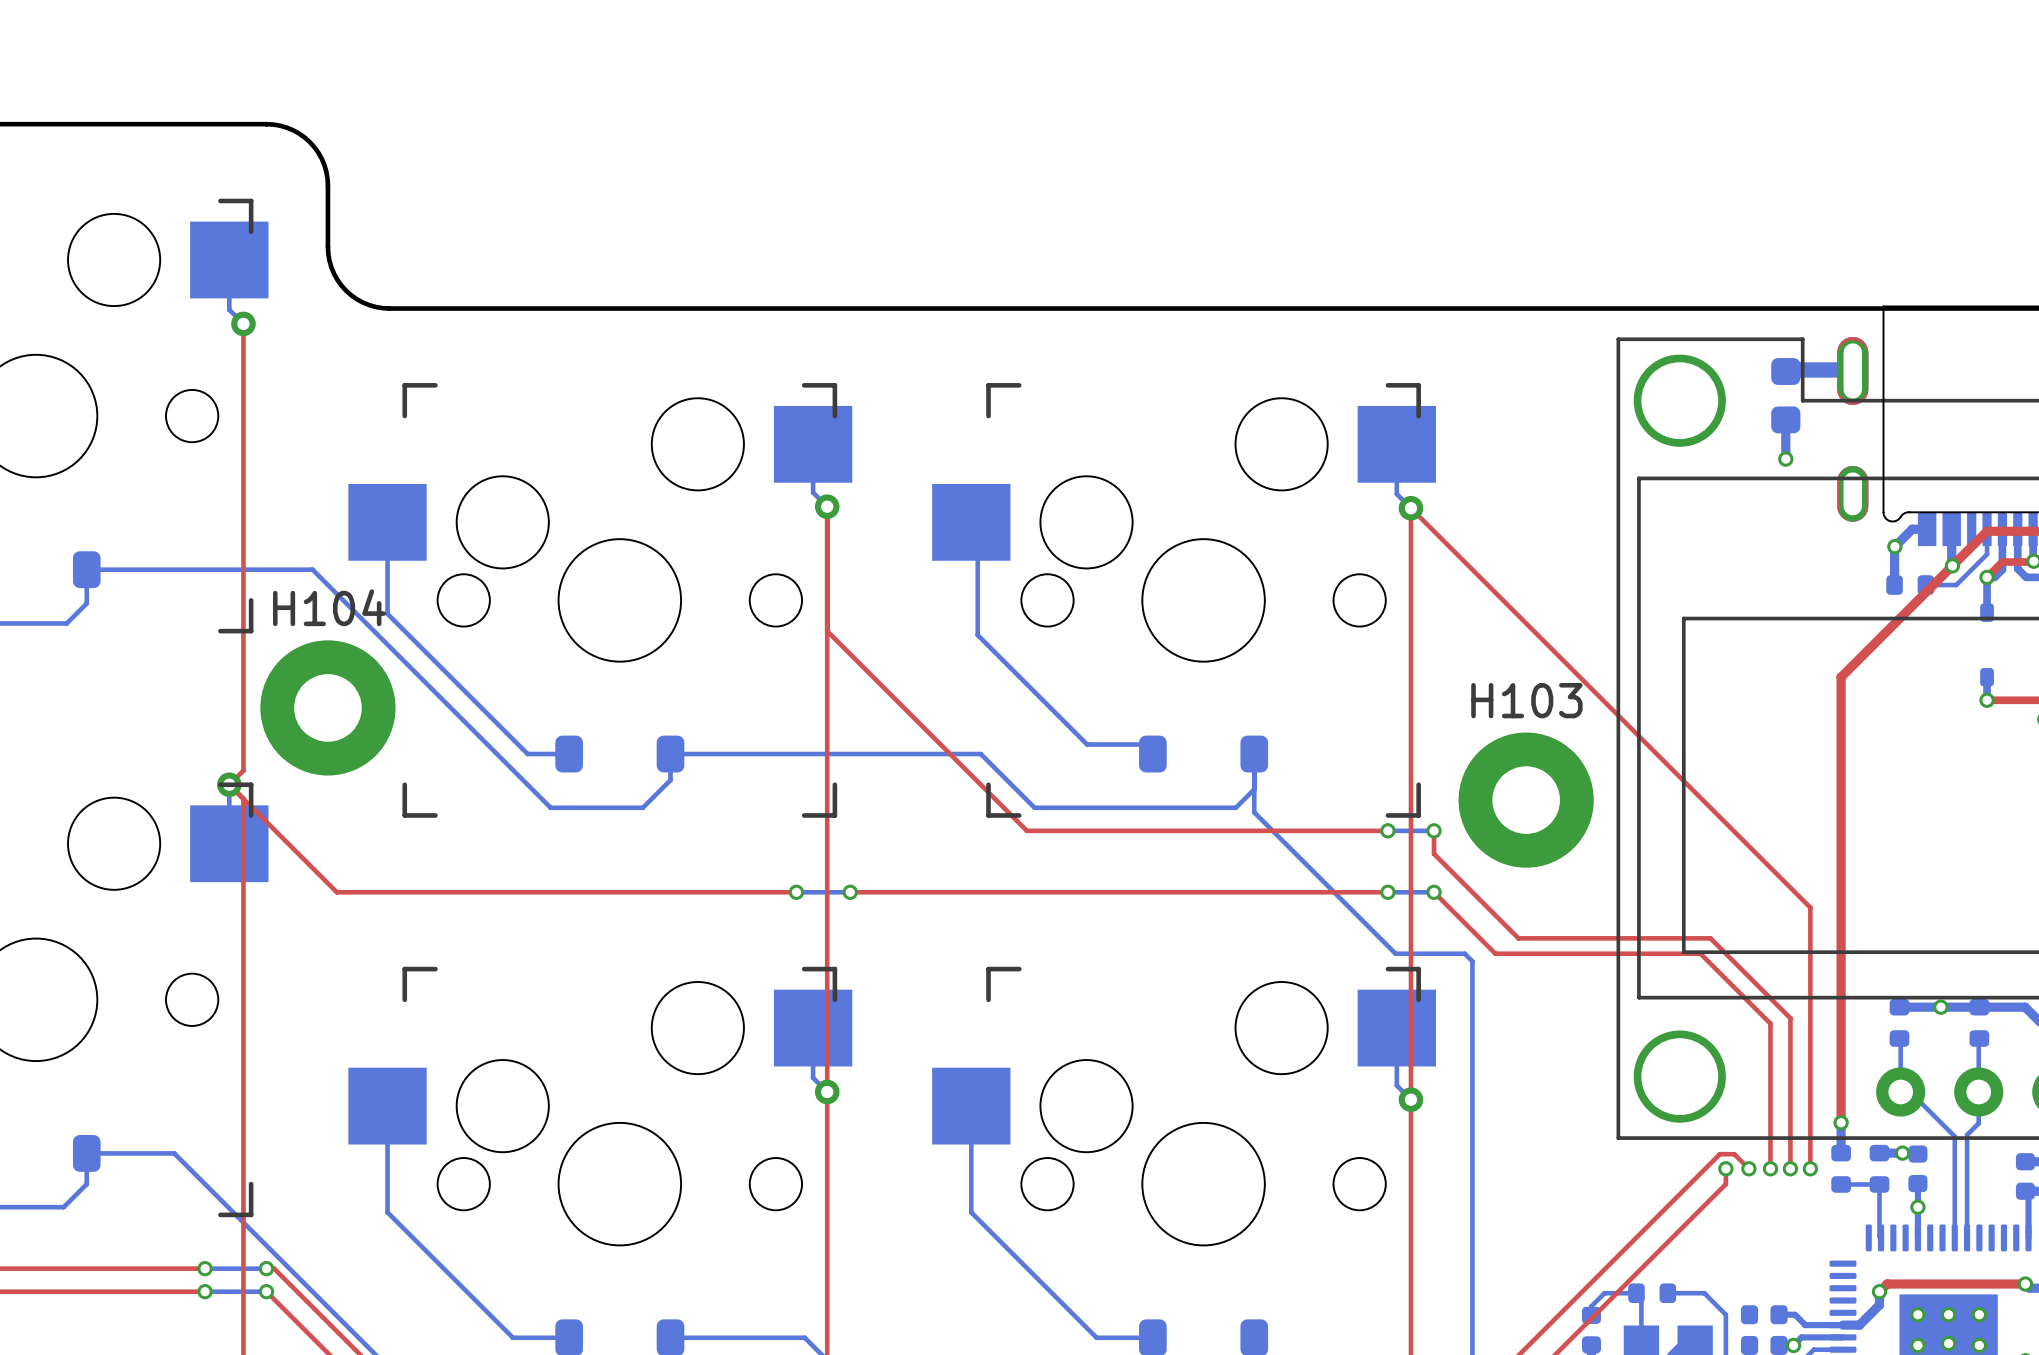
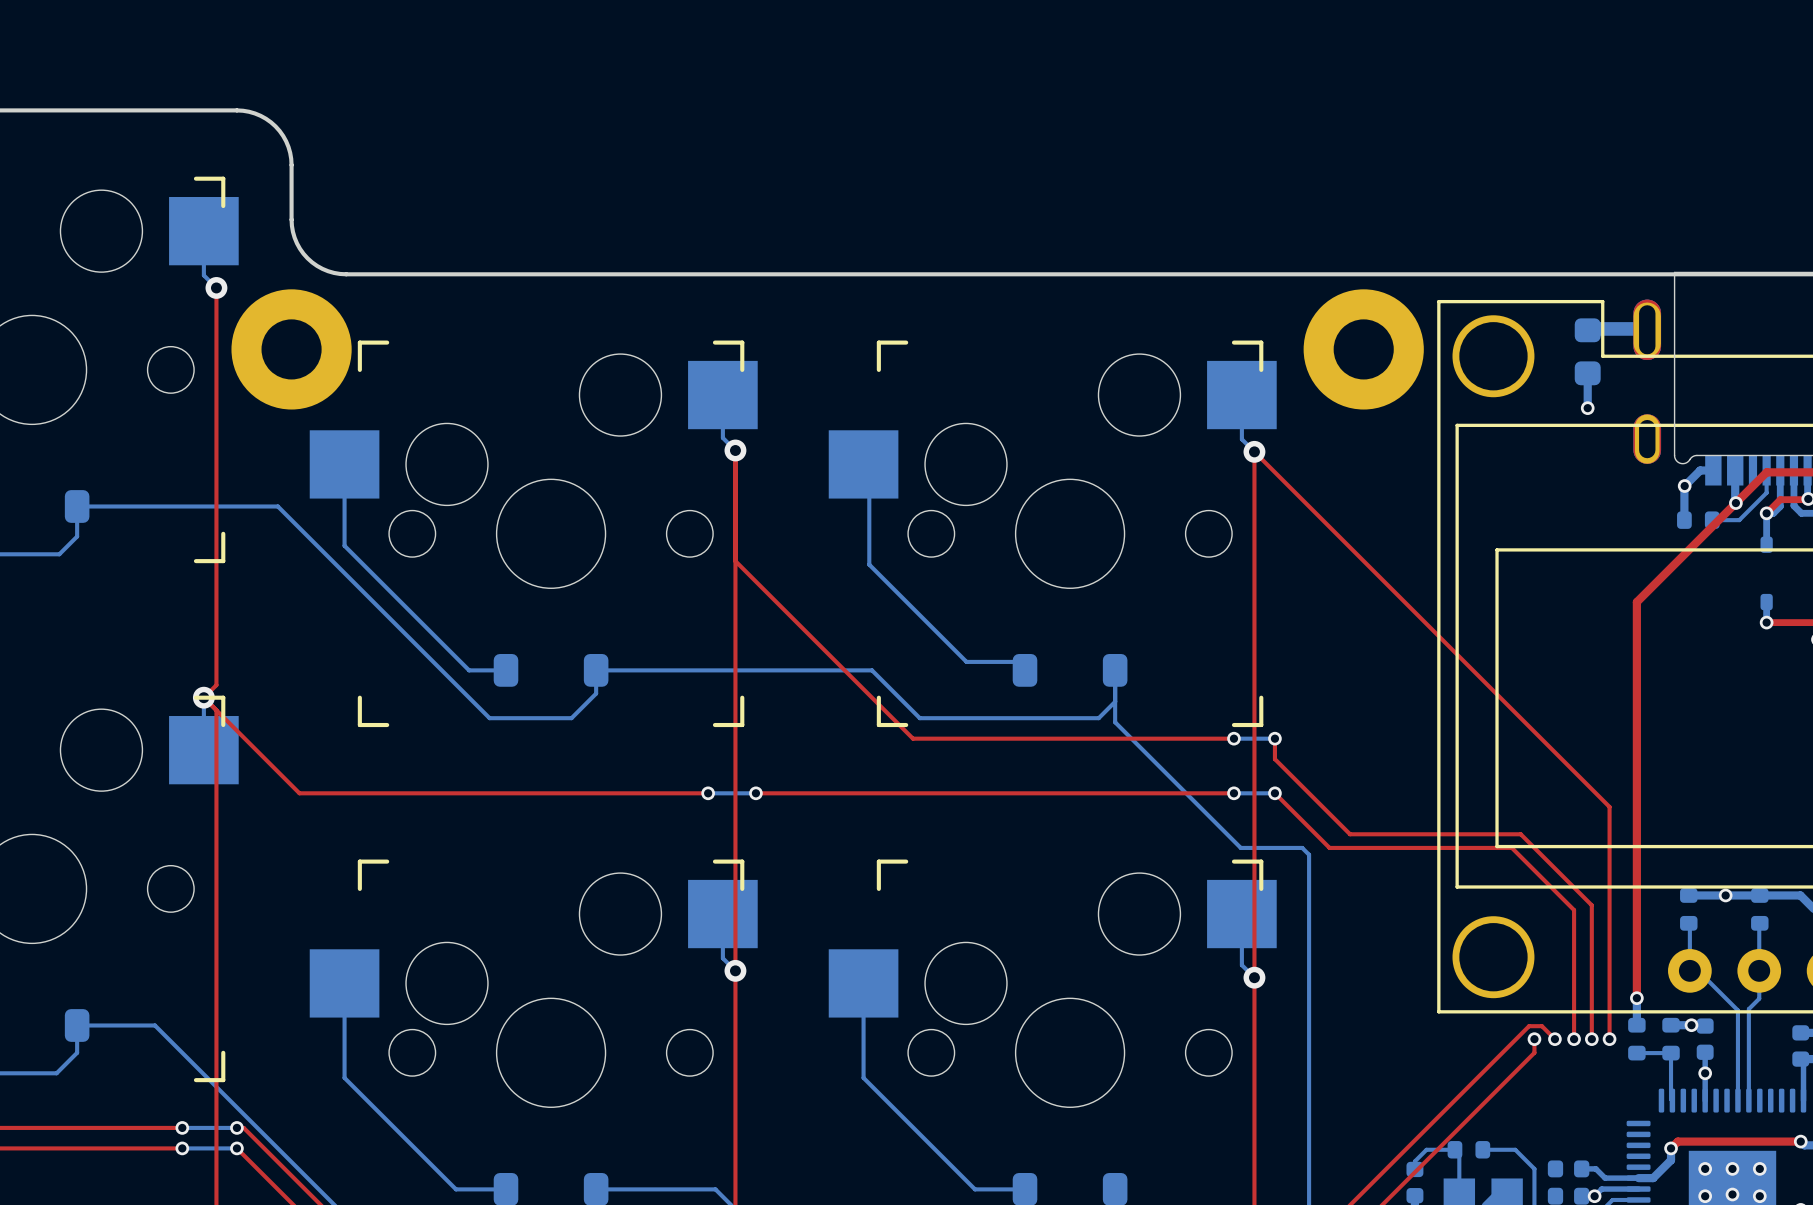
part: none -> (291, 349)
part: none -> (1363, 349)
H104: (327, 707) -> none
H103: (1526, 800) -> none

